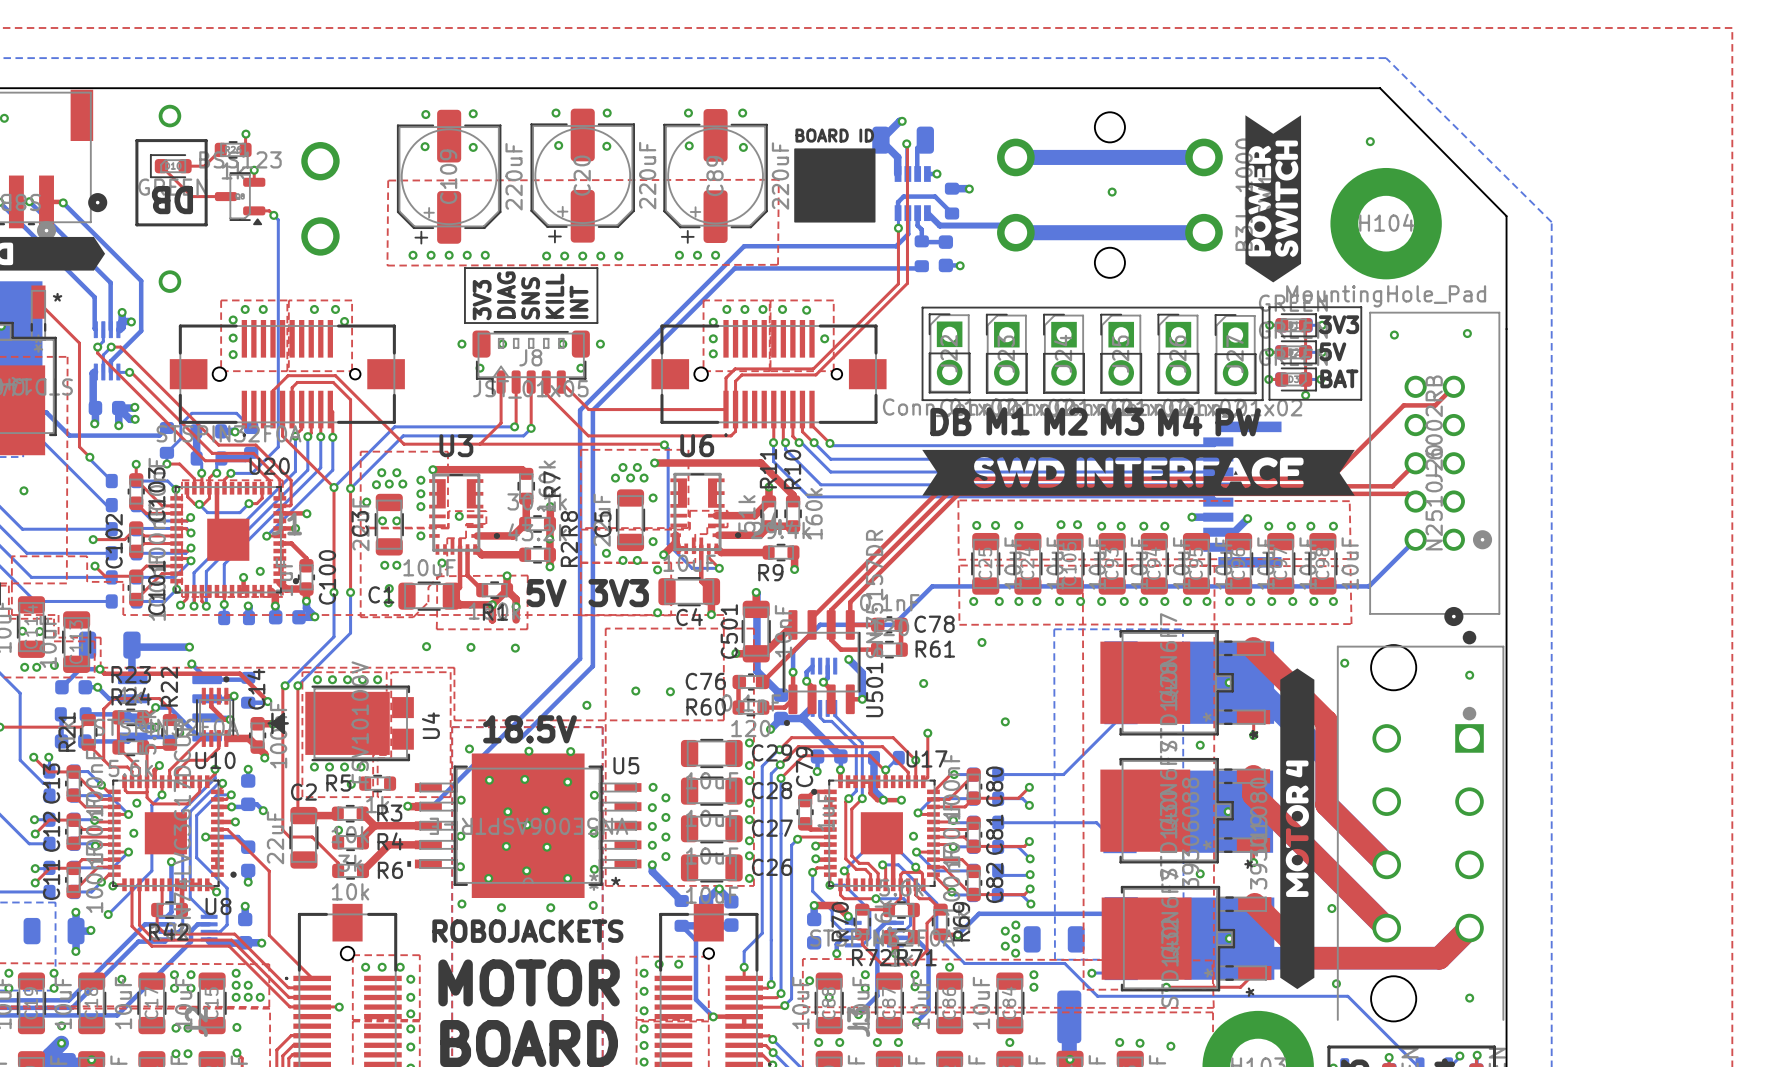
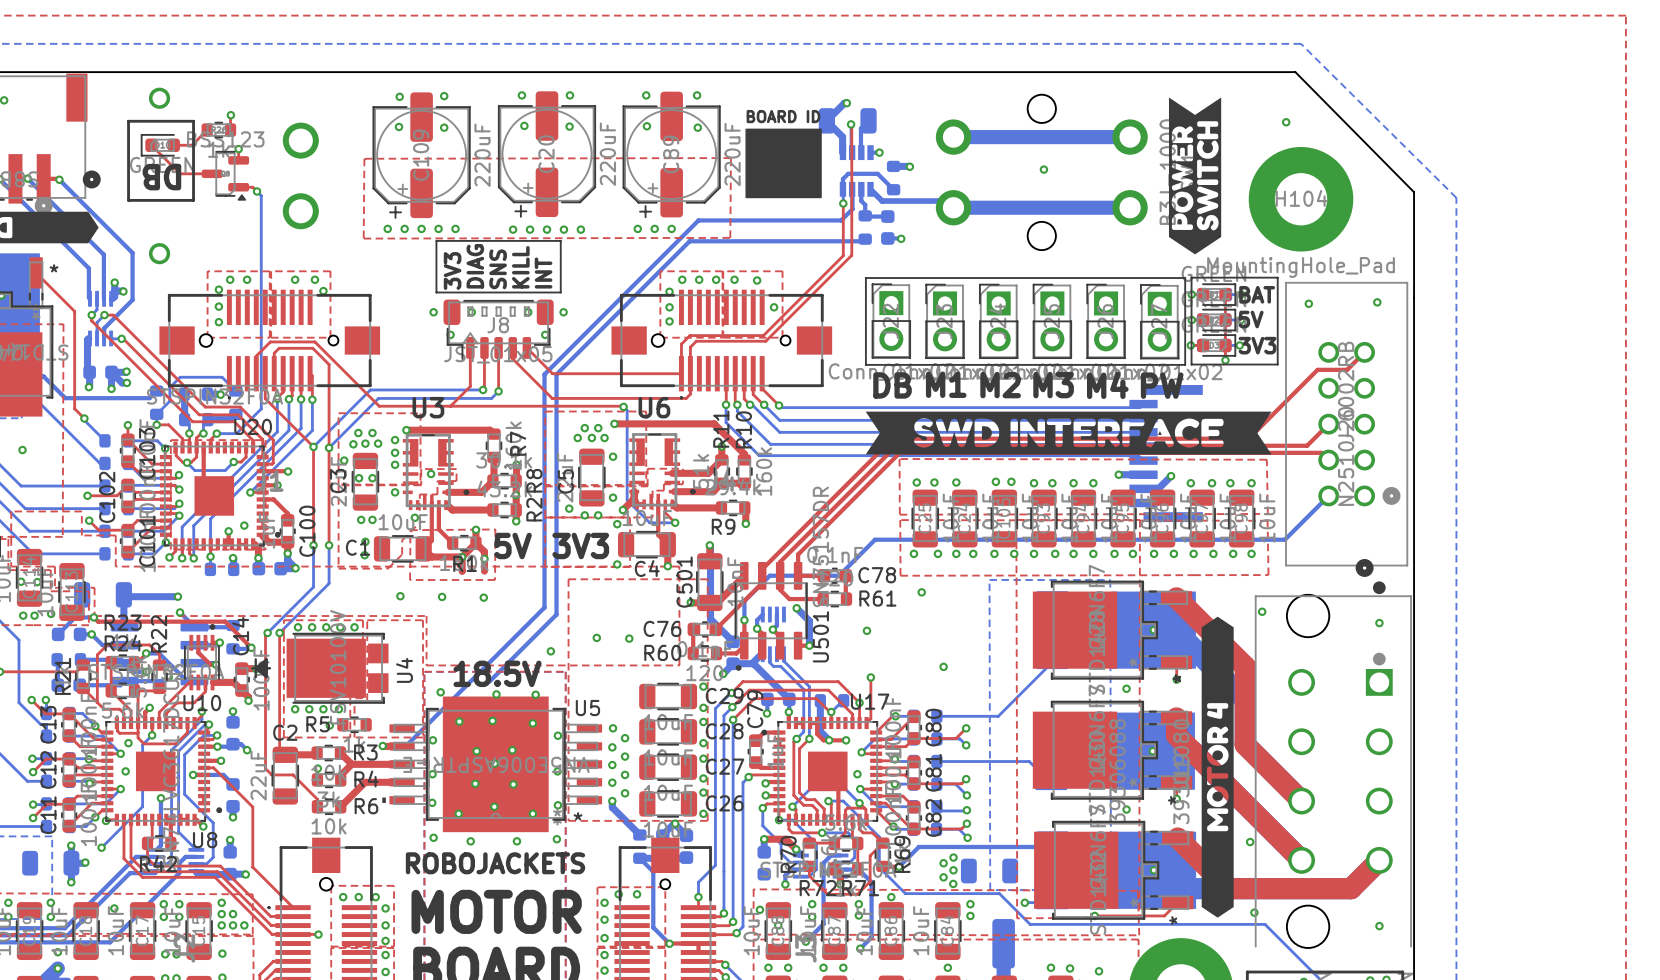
text: 3V3 (1339, 324) -> BAT (1257, 294)
text: BAT (1339, 378) -> 3V3 (1257, 345)

